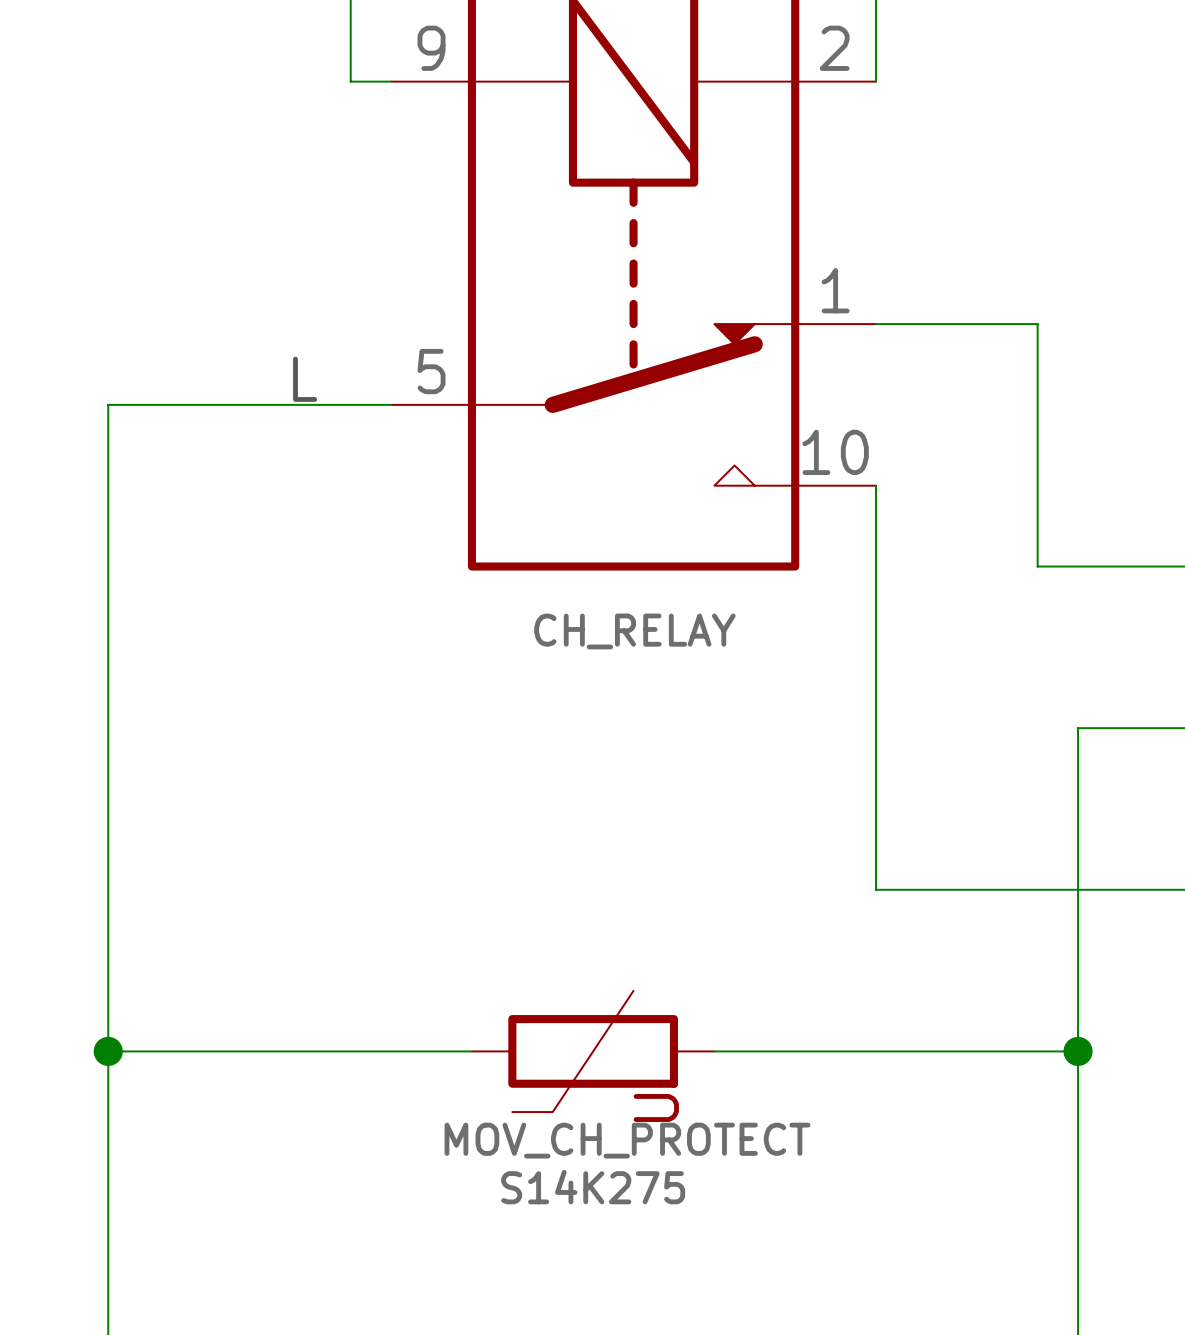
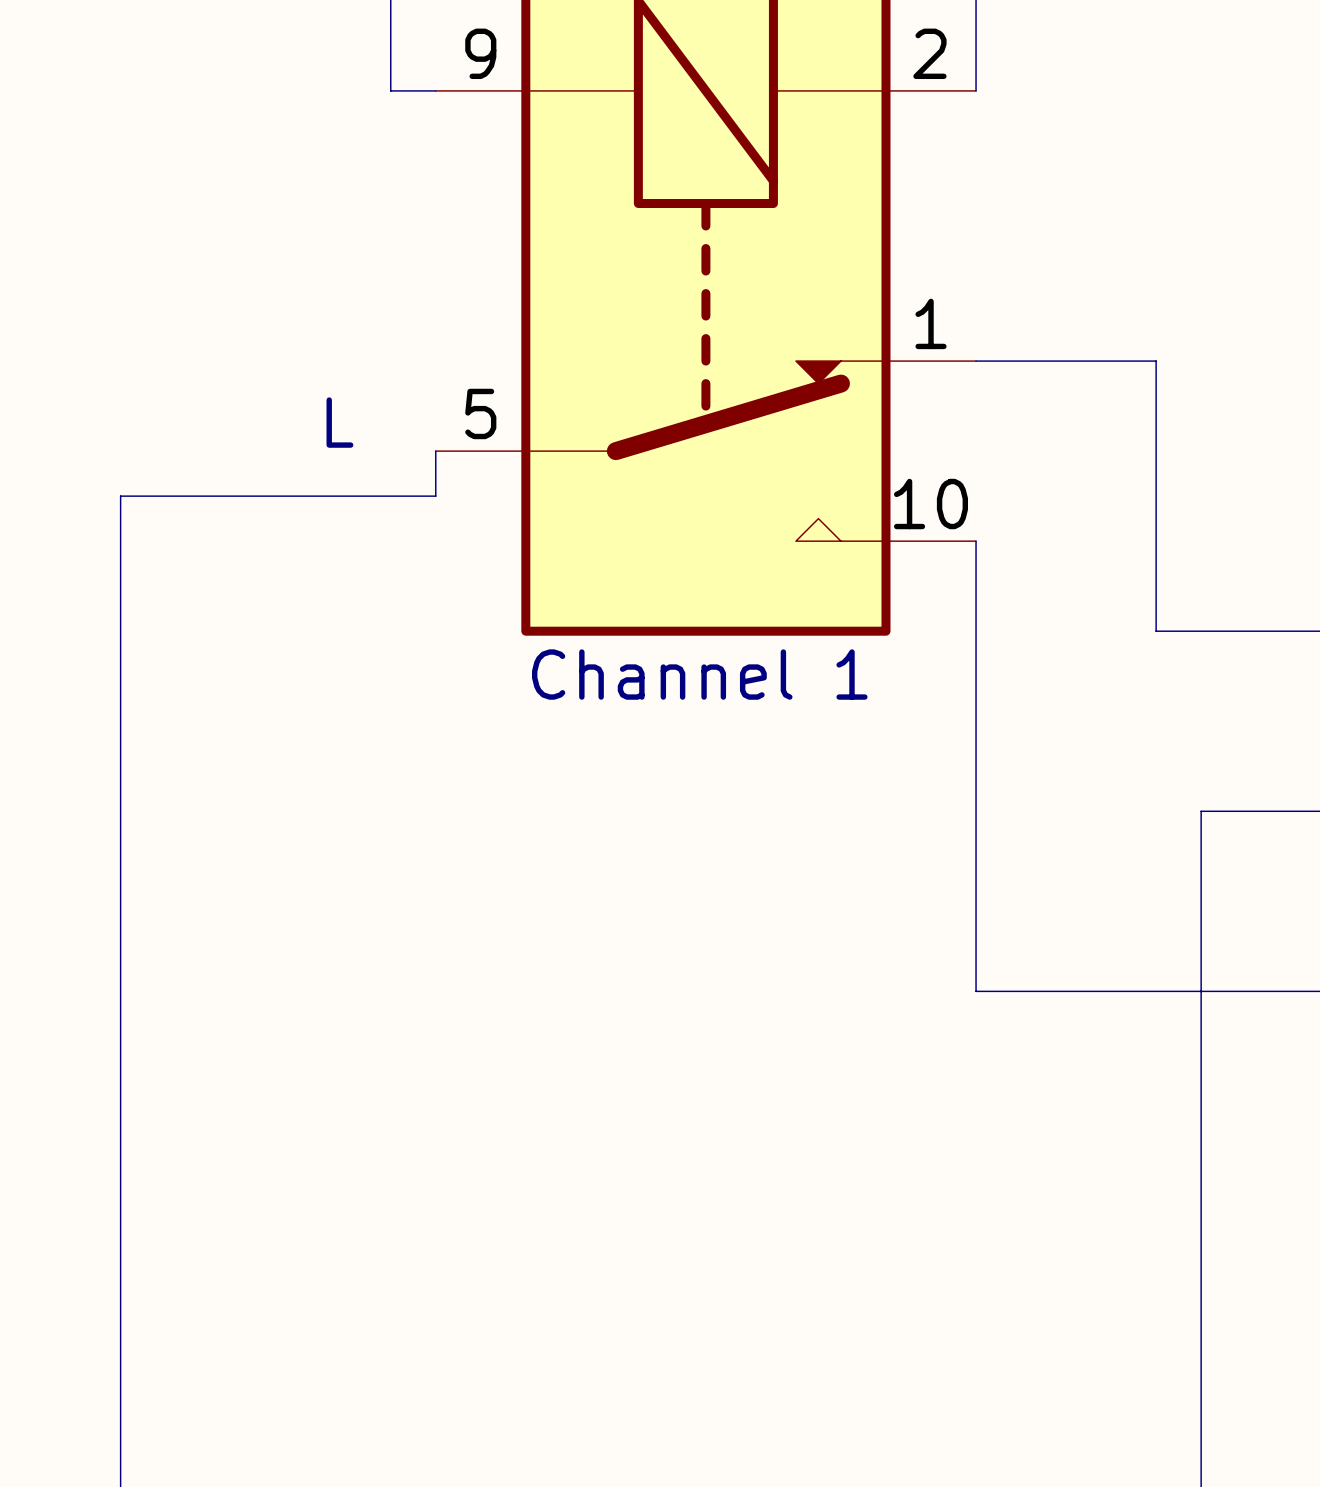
wire: (391, 404) (108, 404) (108, 445) -> (435, 451) (435, 496) (120, 496)
CH_RELAY value: none -> Channel 1 (699, 674)
CH_RELAY name: CH_RELAY (634, 631) -> none
wire: (108, 1051) (471, 1051) -> none
junction: (108, 1051) -> none
MOV_CH_PROTECT: S14K275 (593, 1051) -> none
wire: (714, 1051) (1078, 1051) -> none
junction: (1078, 1051) -> none

